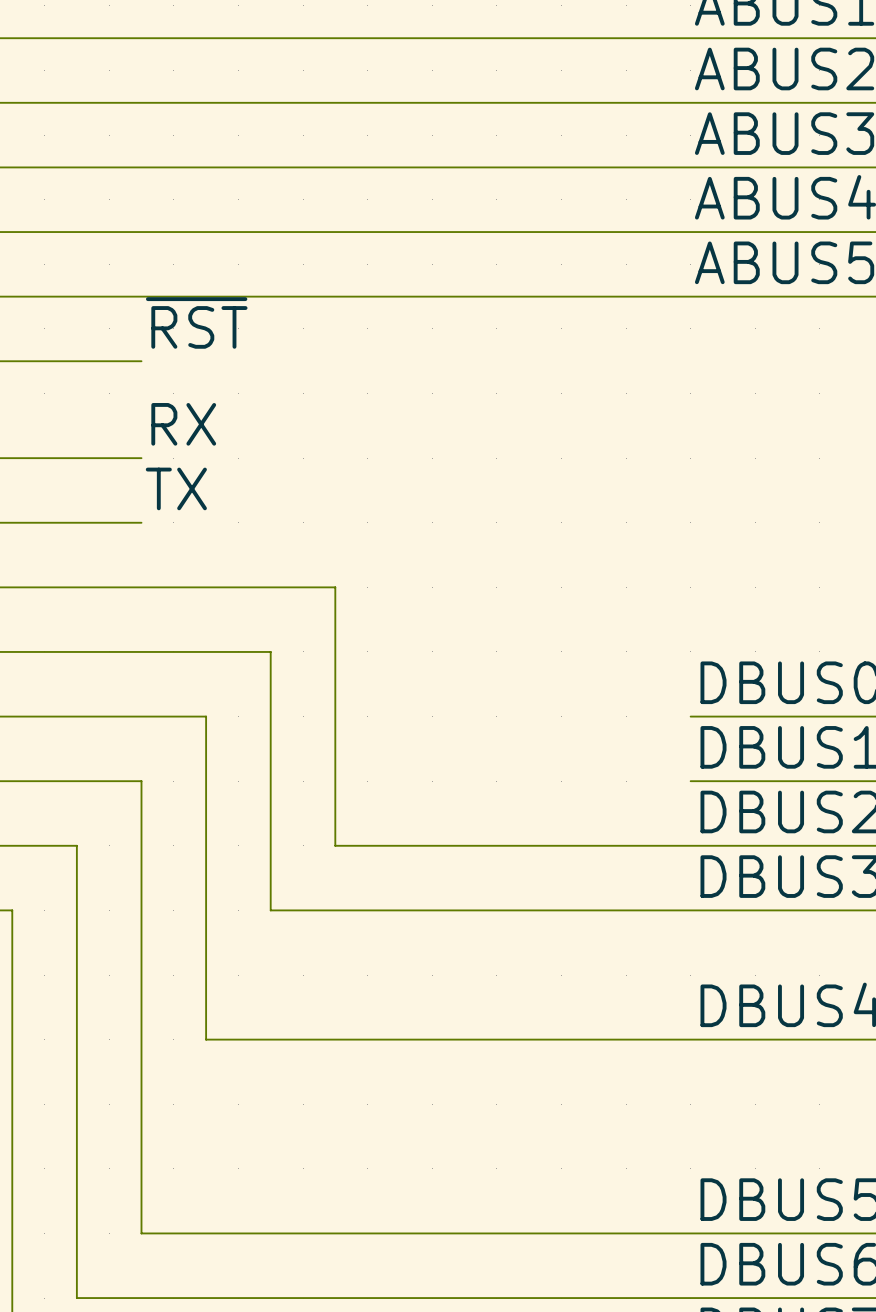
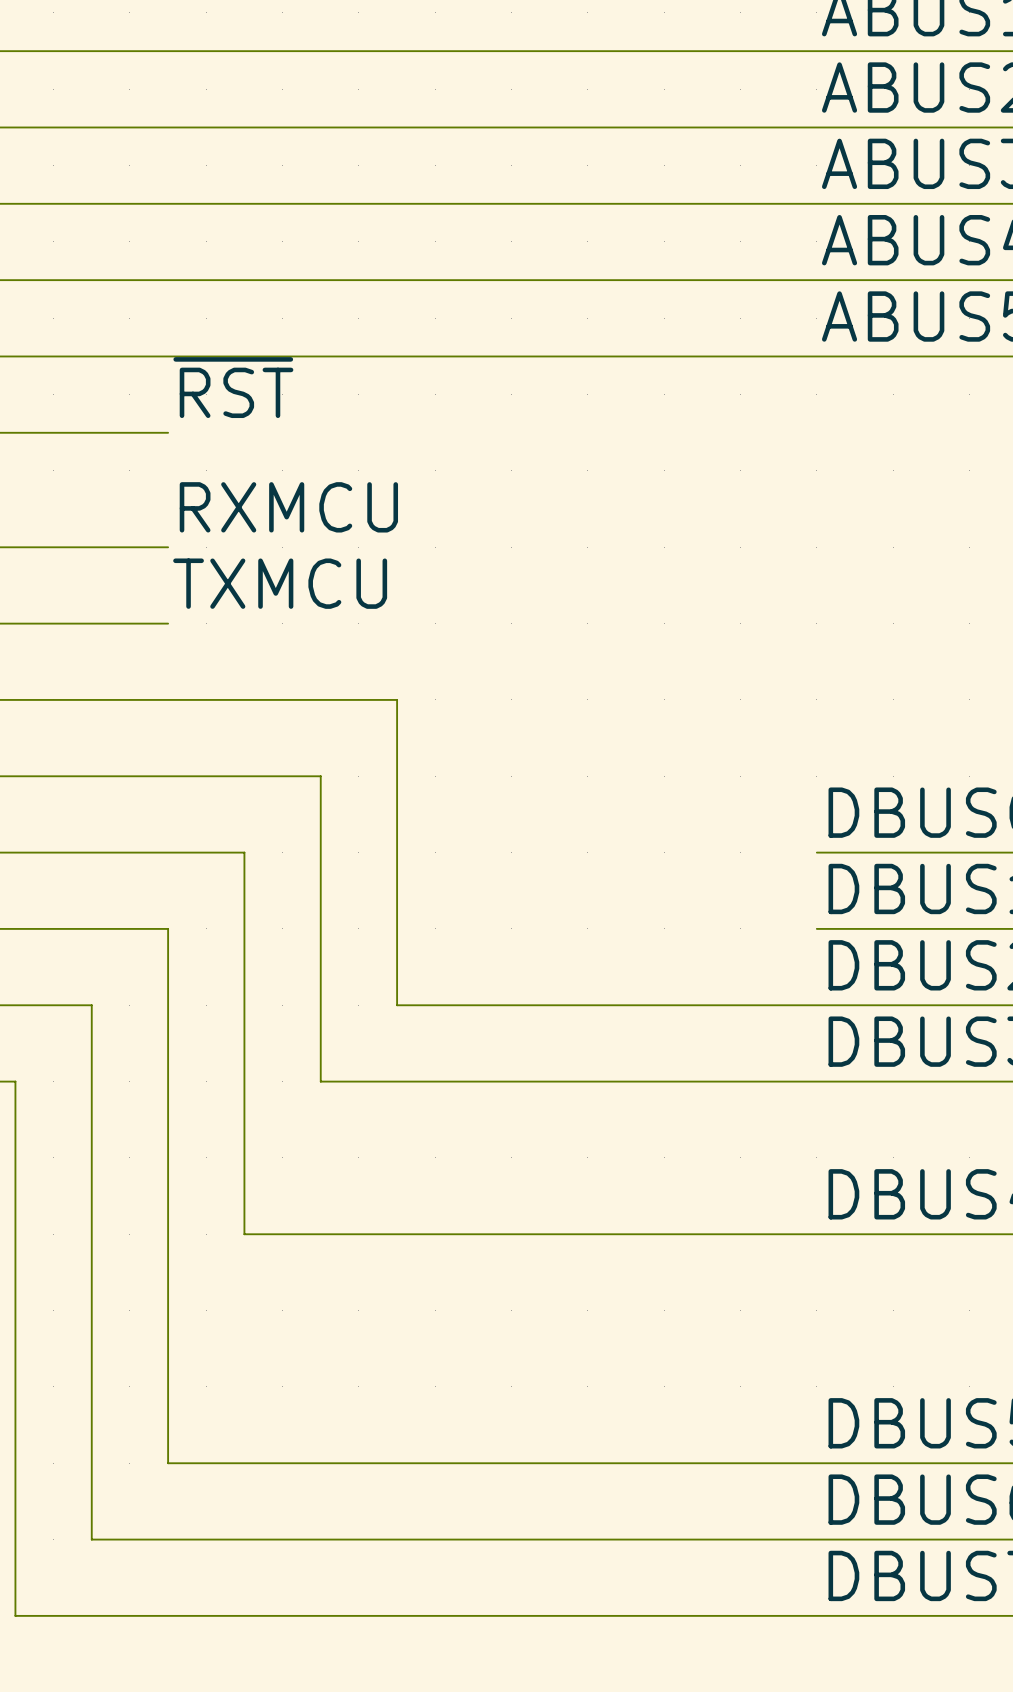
label: RX (183, 424) -> RXMCU (288, 507)
label: TX (176, 488) -> TXMCU (280, 583)

